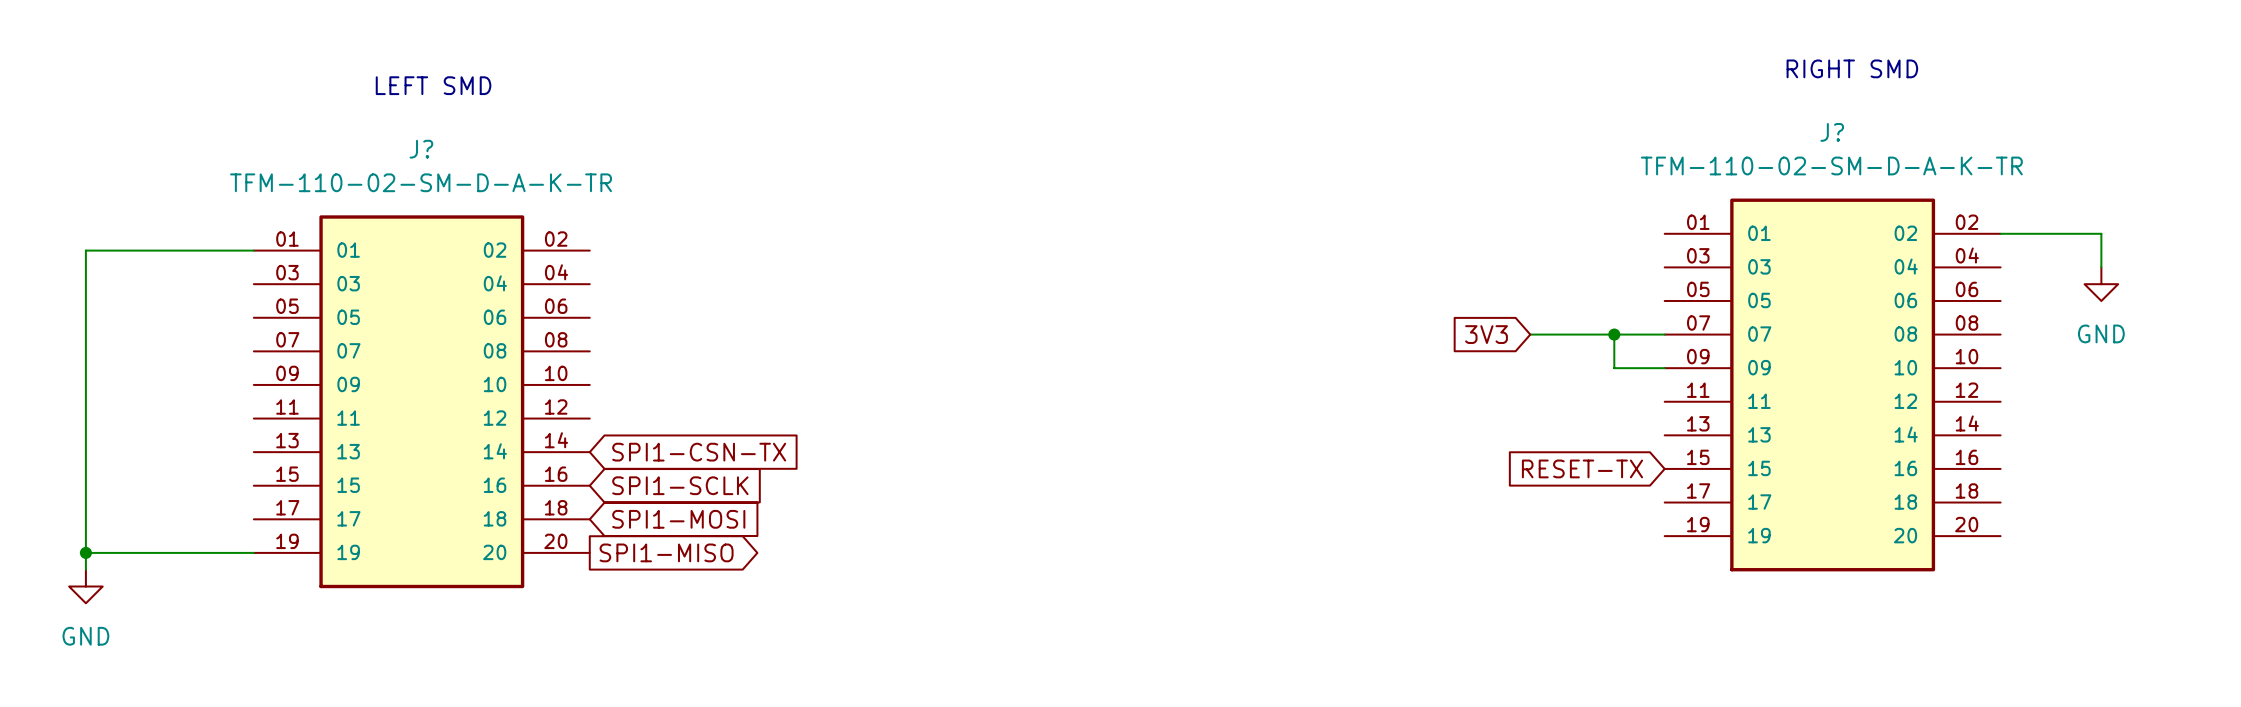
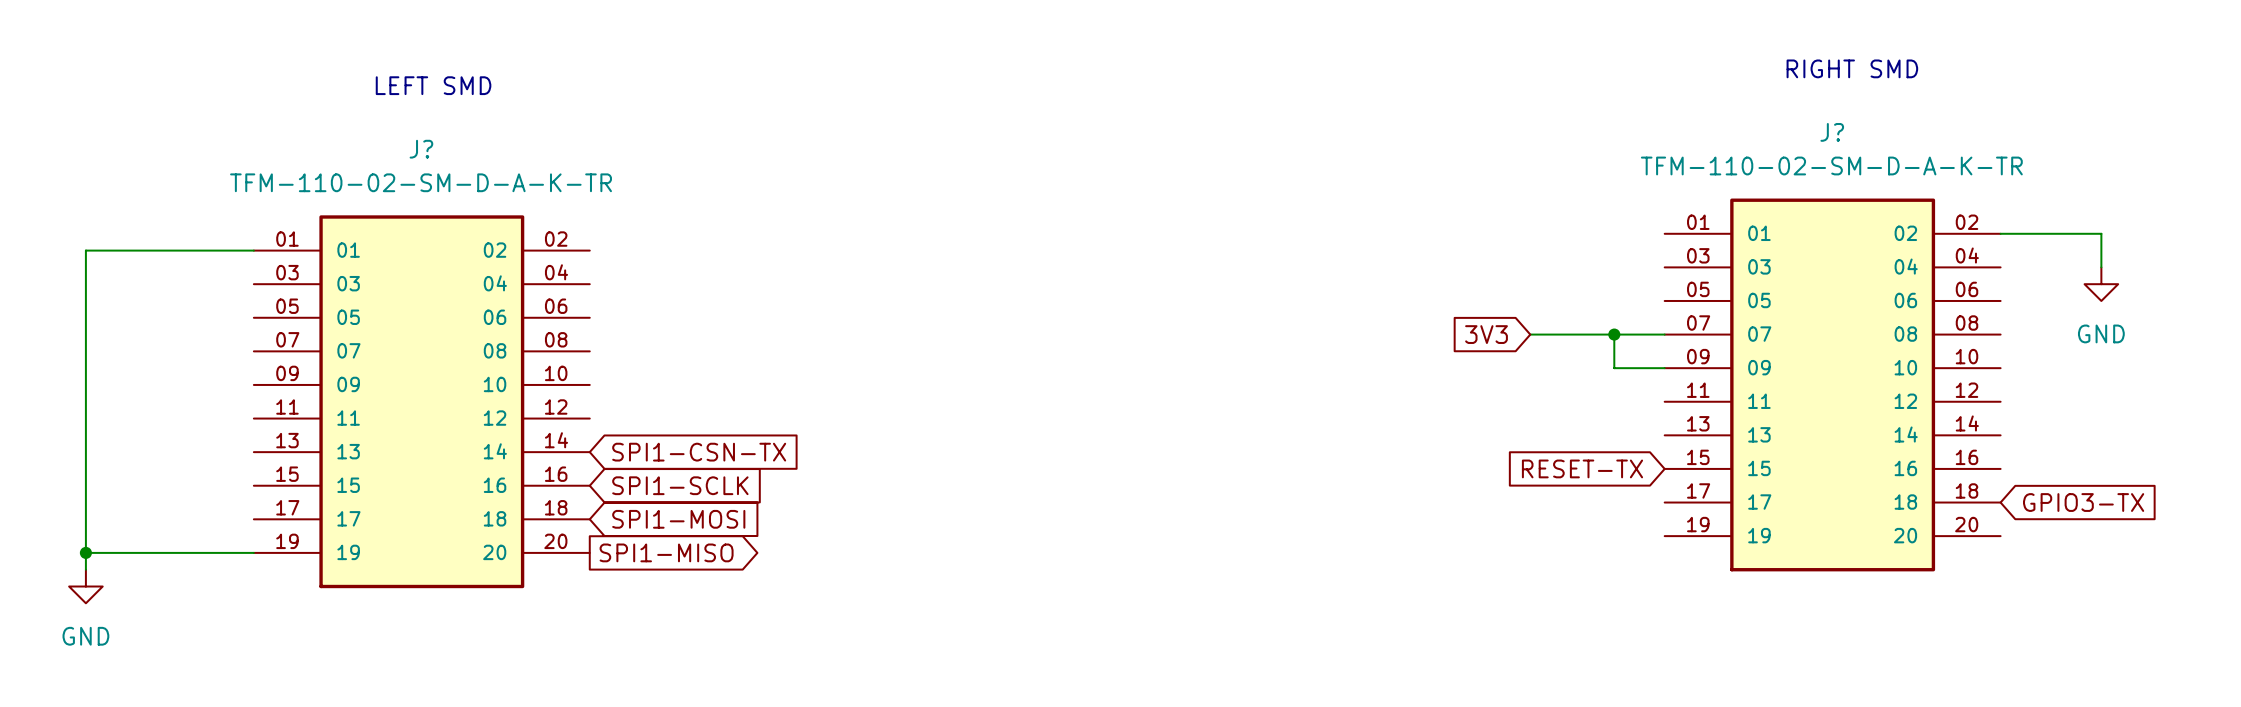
global label: none -> GPIO3-TX (2083, 502)

